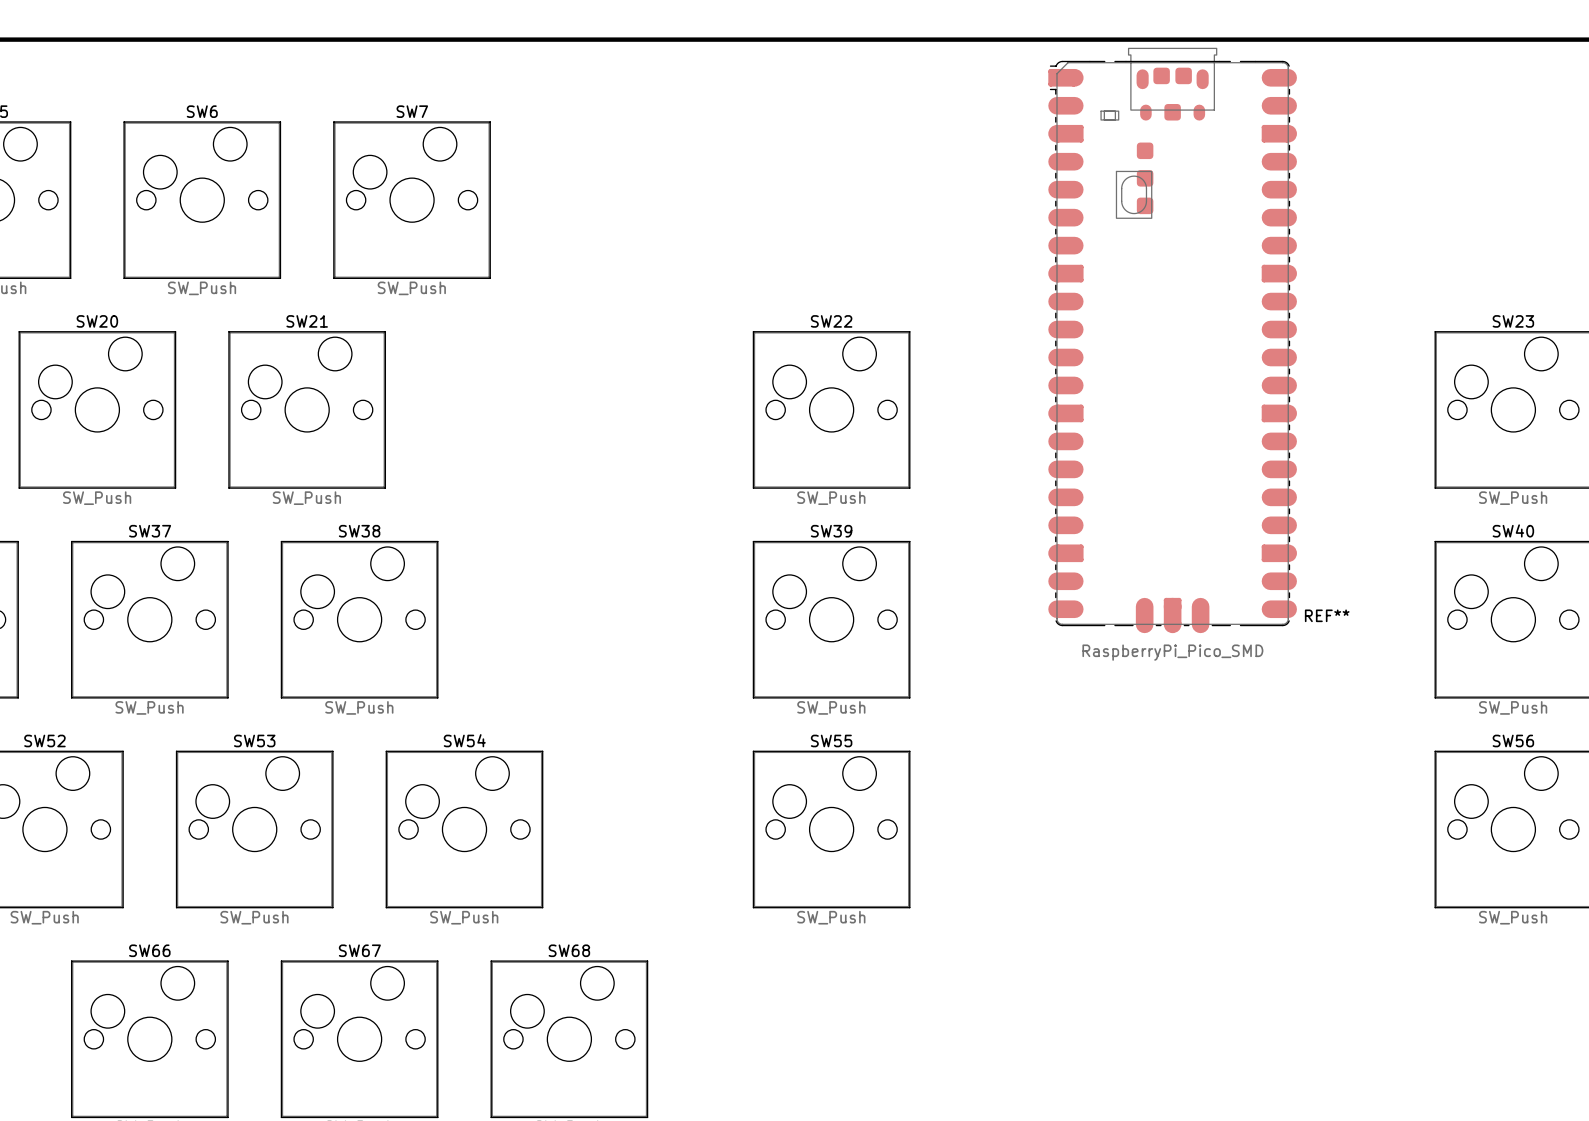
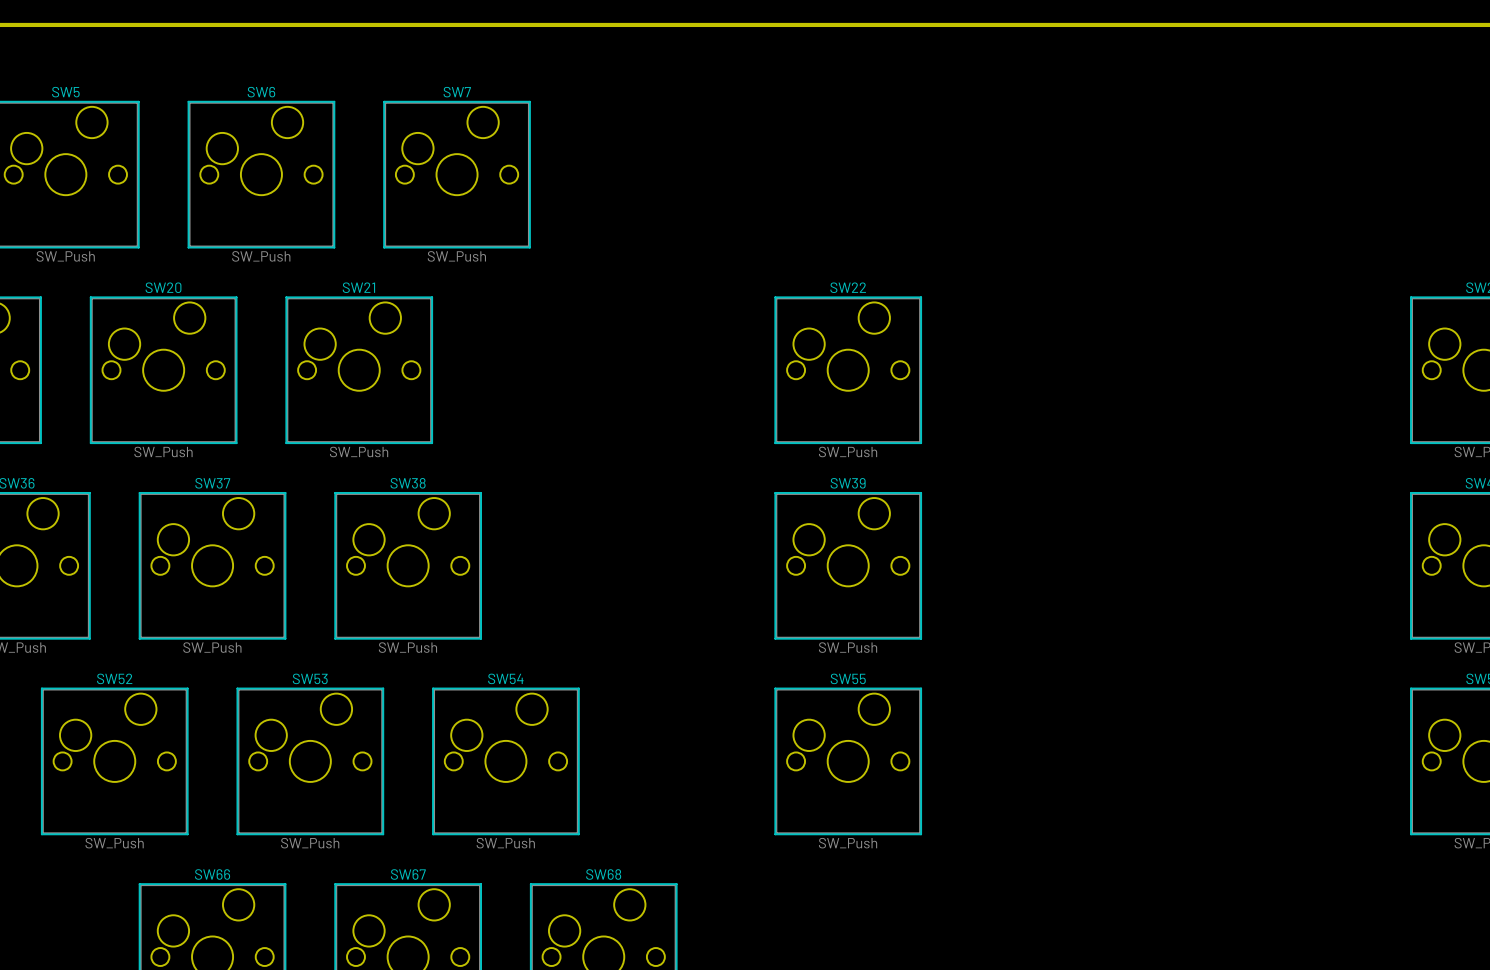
REF**: RaspberryPi_Pico_SMD (1172, 340) -> none

